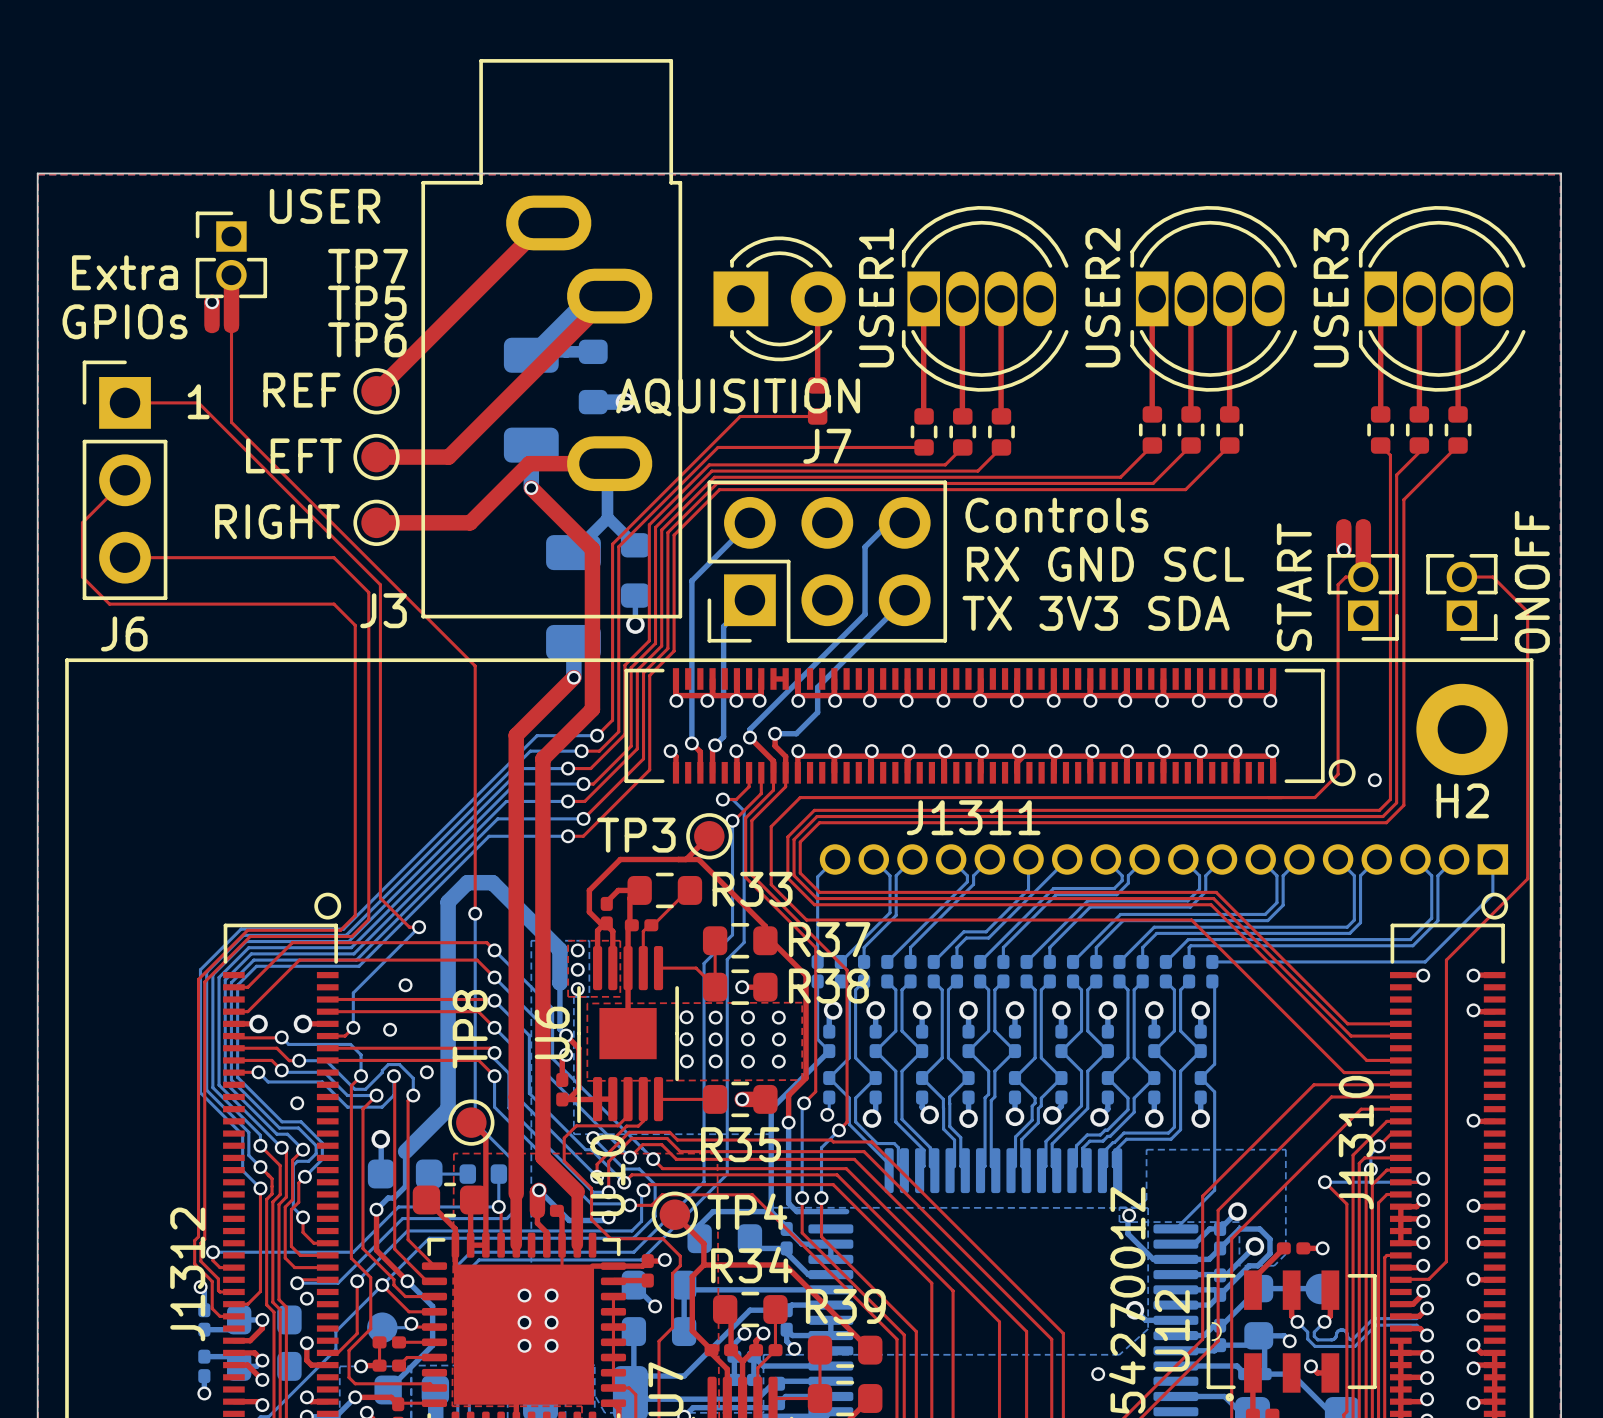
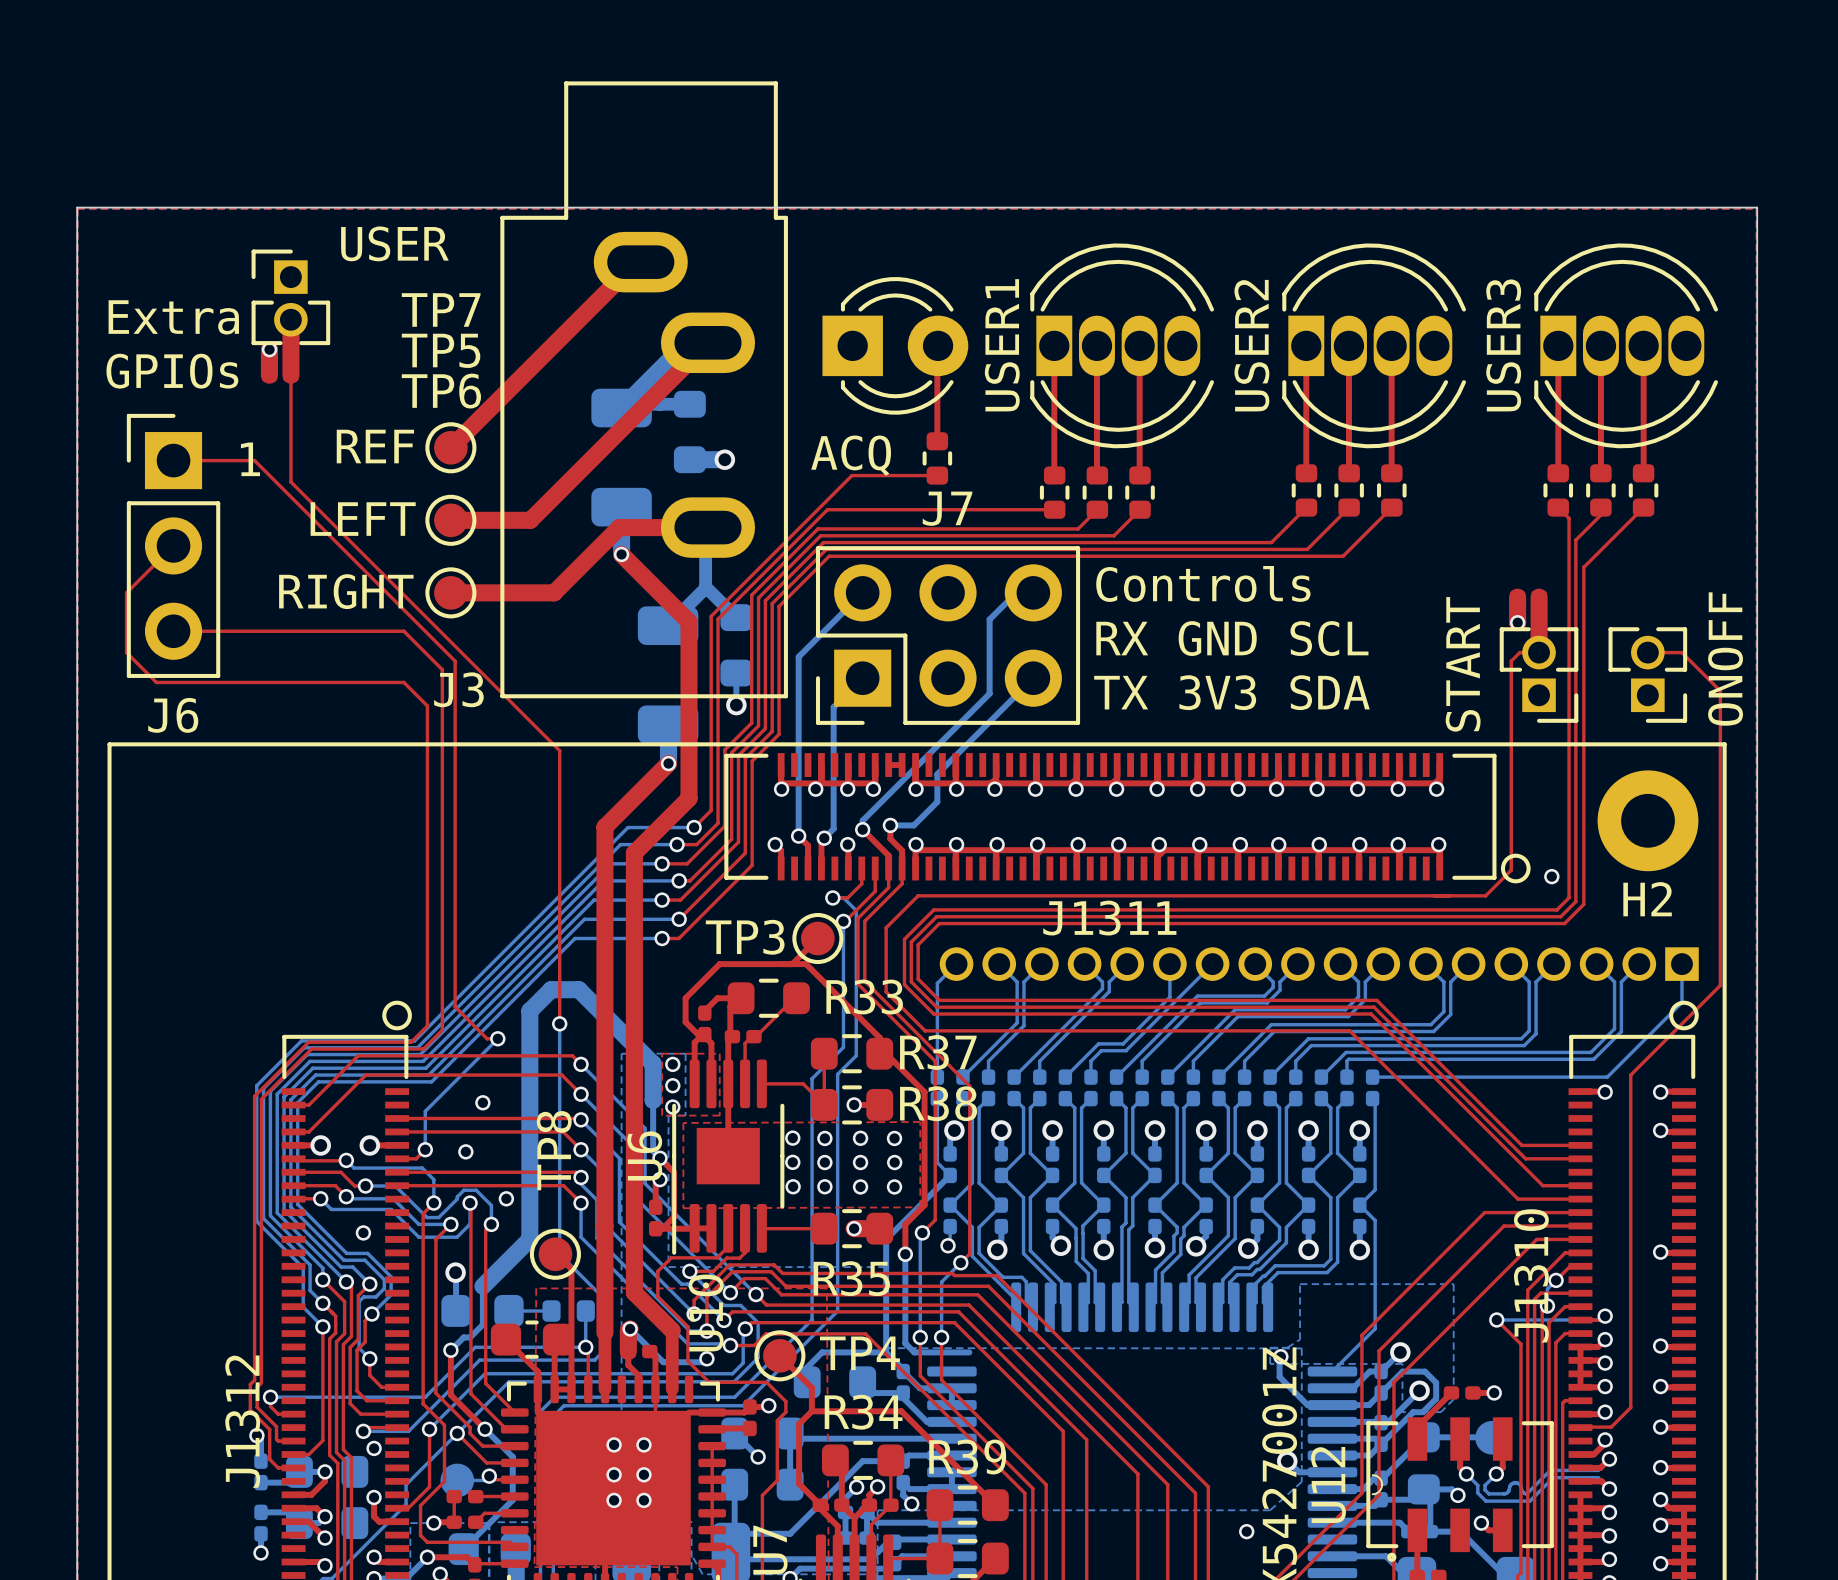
part value: AQUISITION (738, 397) -> ACQ (851, 455)

